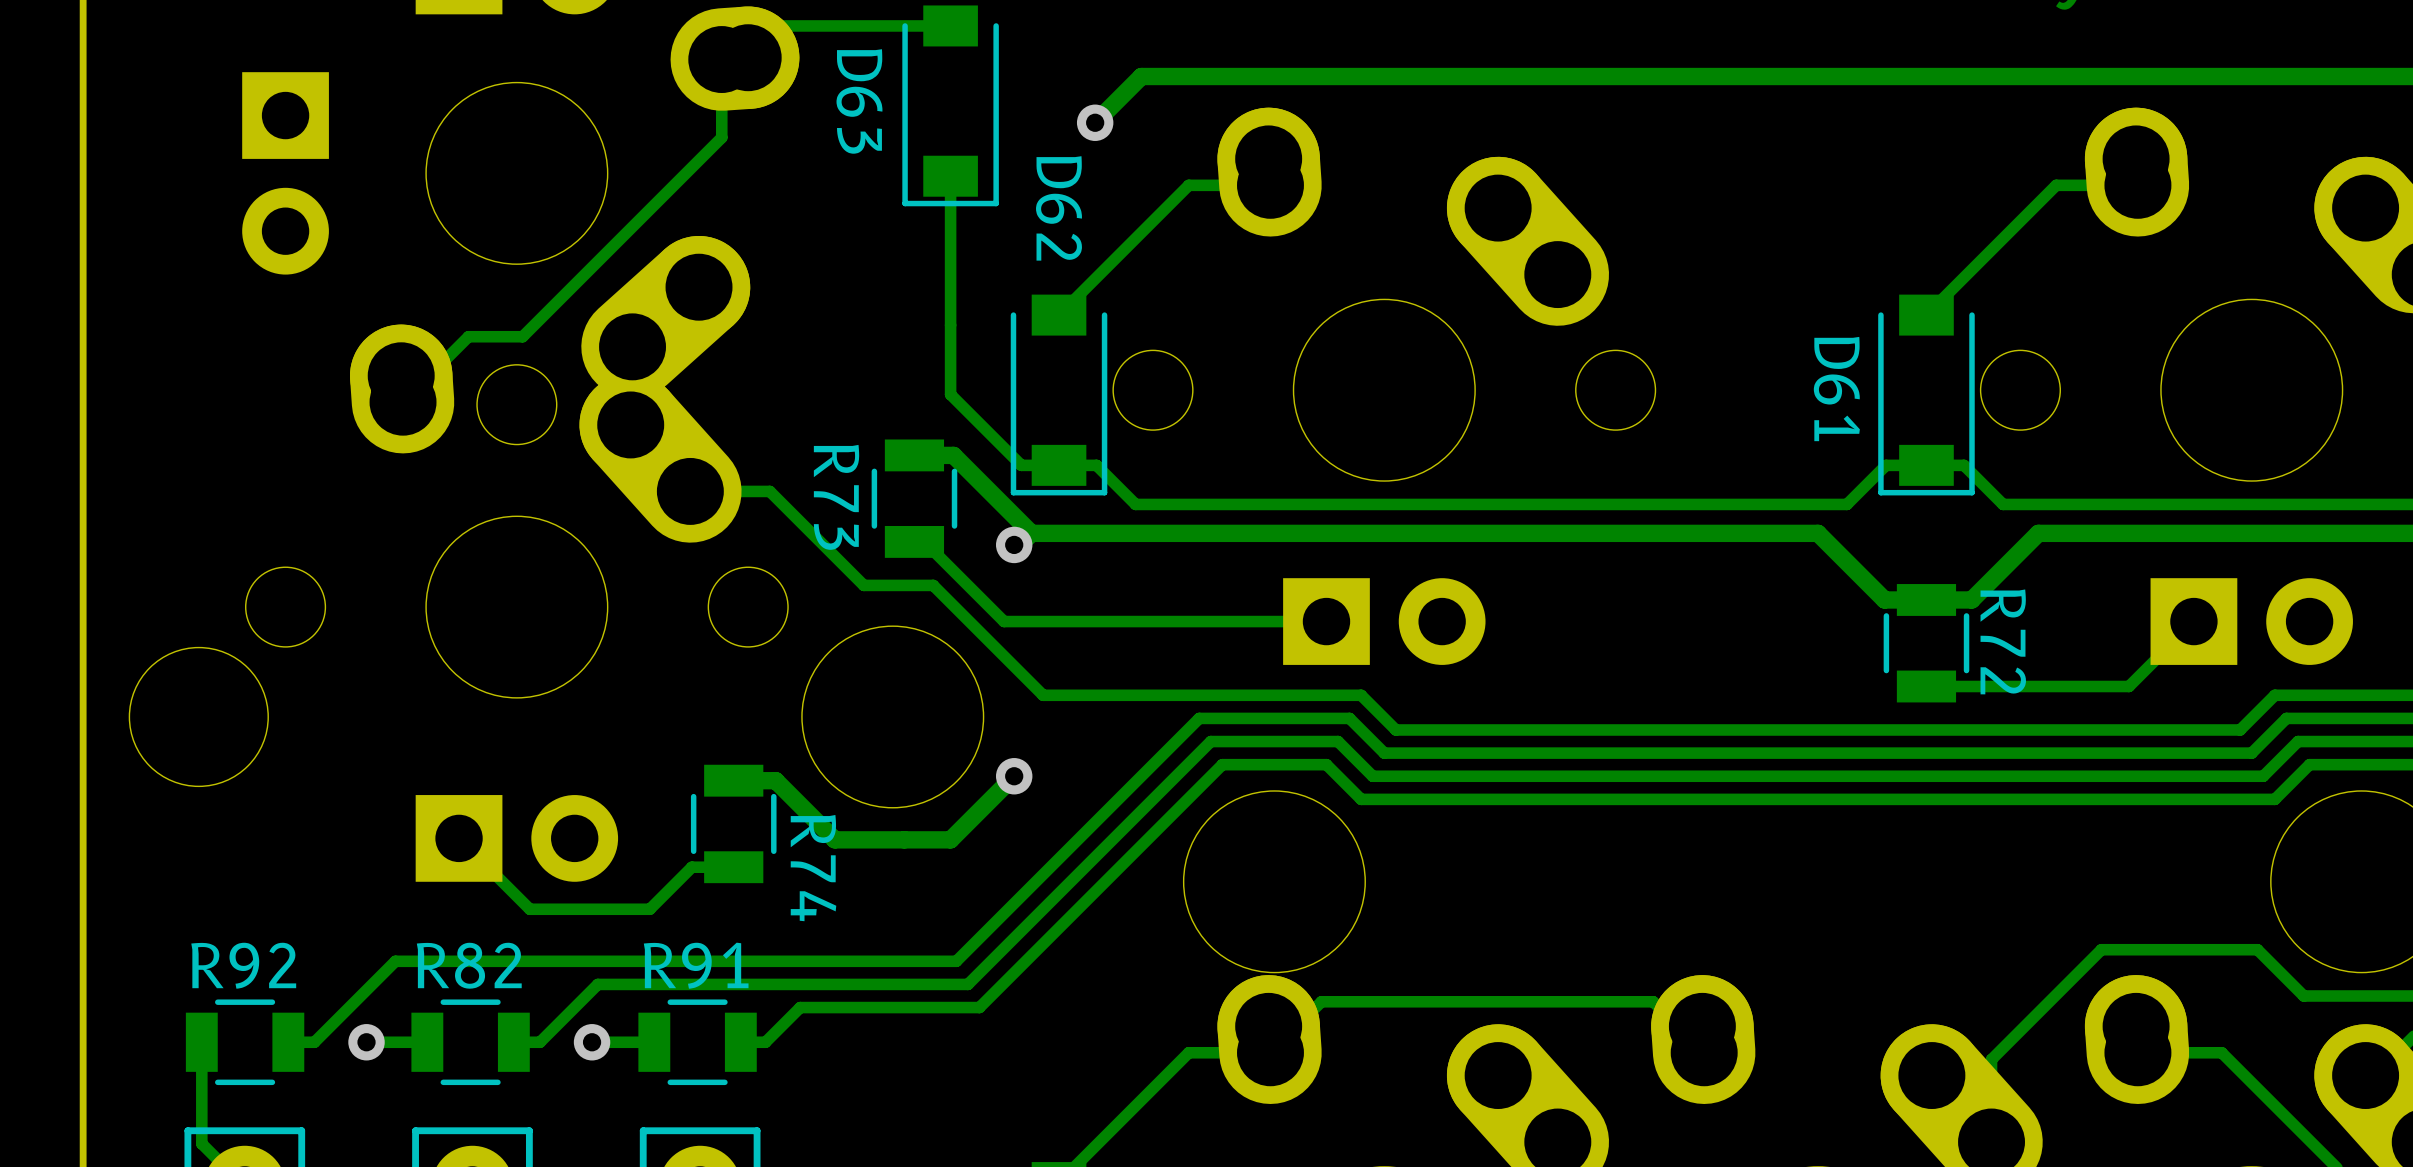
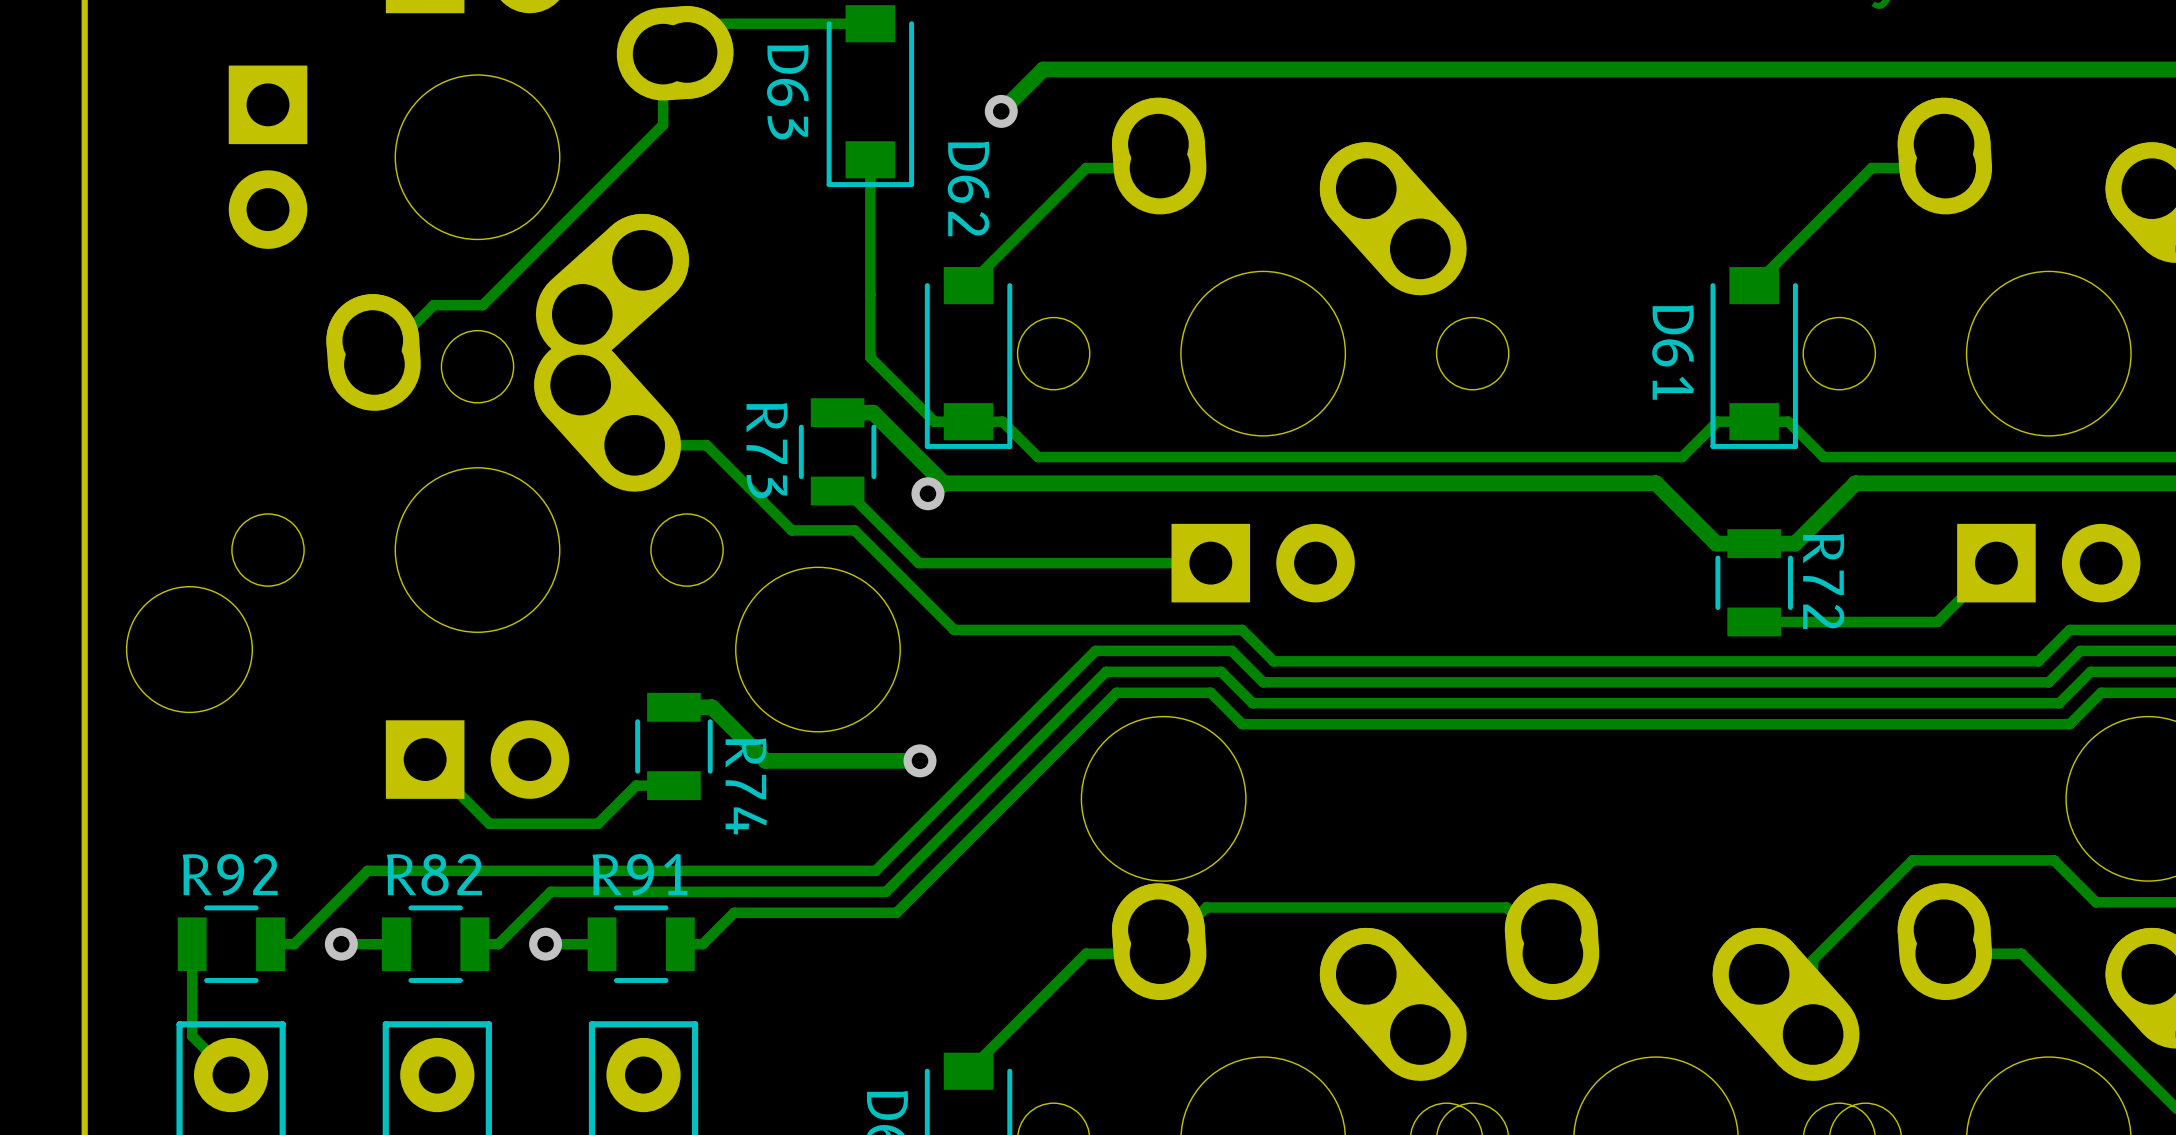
track: (1014, 776) (950, 839) -> (920, 760) (870, 760)
via position: (1014, 776) -> (920, 760)

